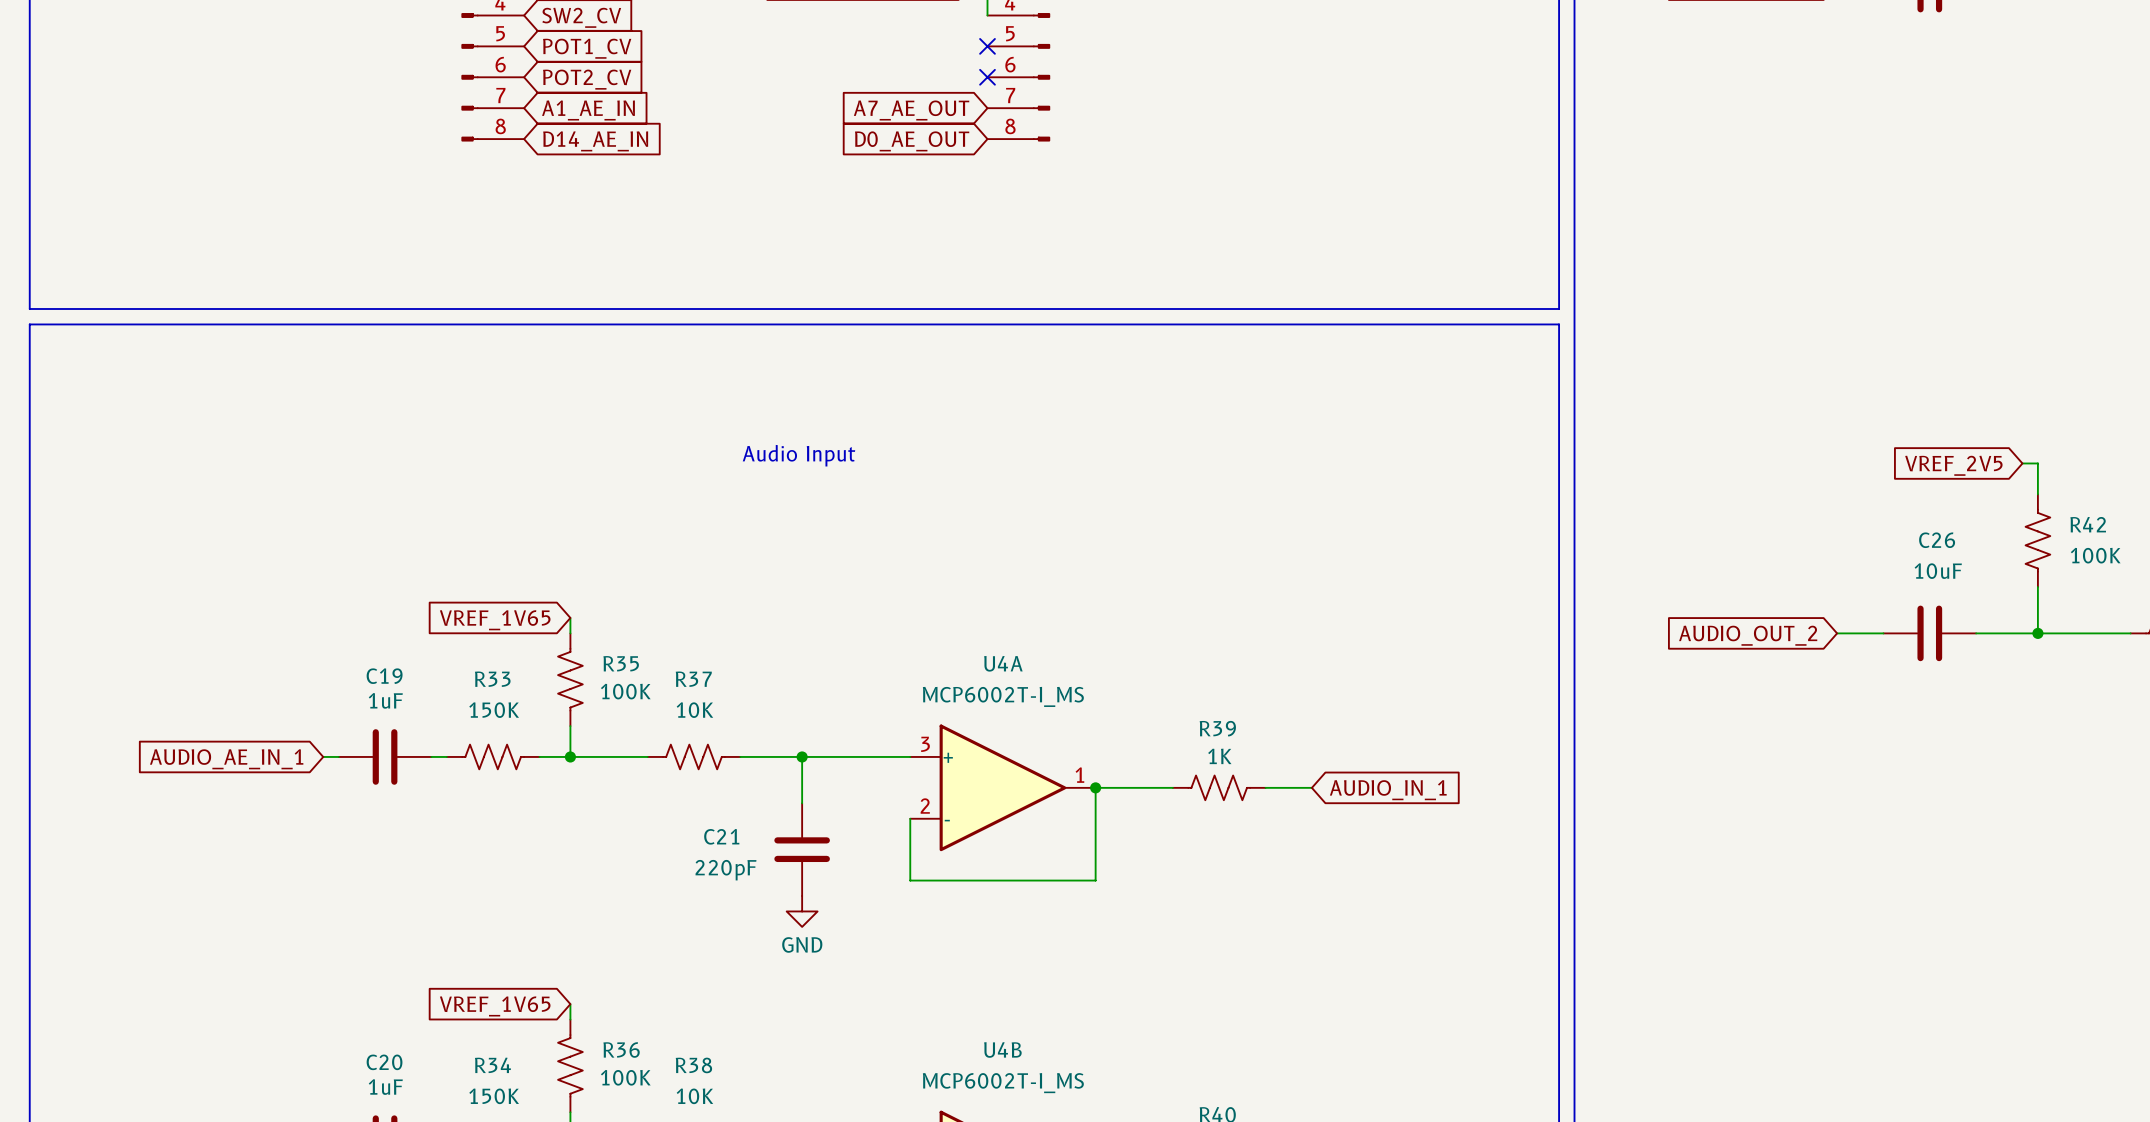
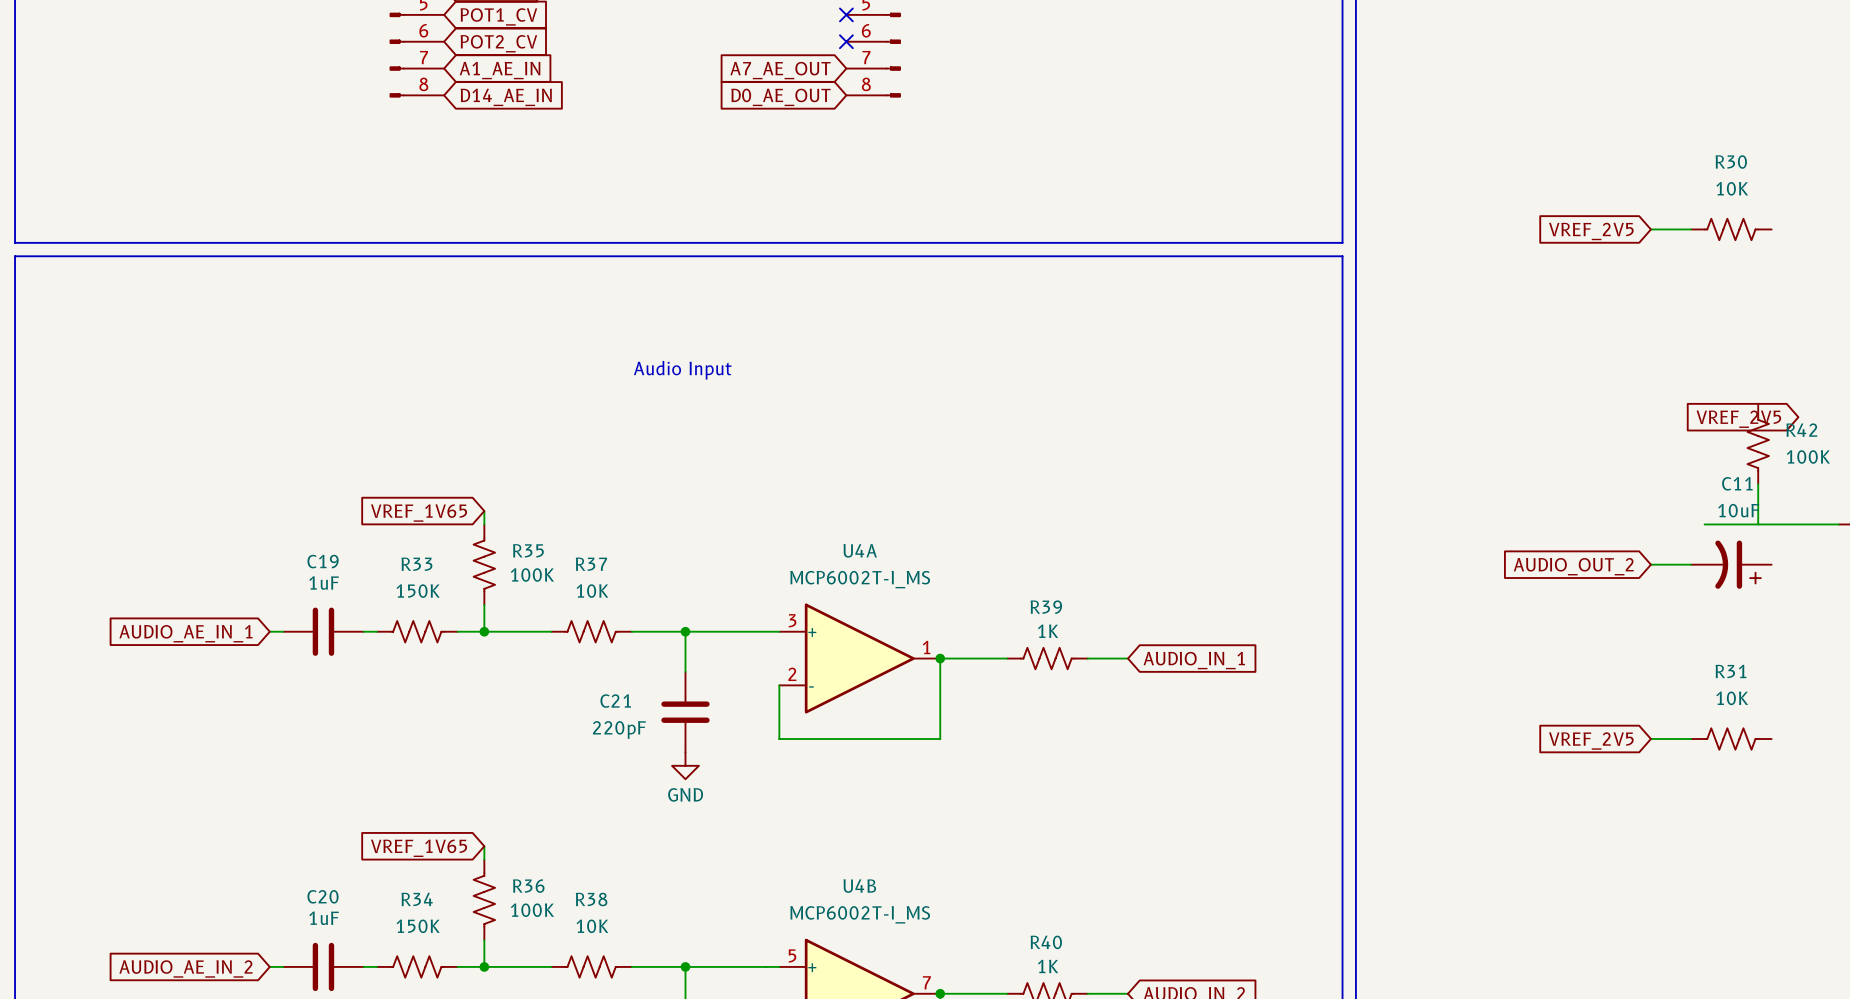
wire: none -> (1650, 229) (1691, 229)
R30: none -> 10K (1731, 229)
global label: none -> VREF_2V5 (1591, 231)
wire: (2022, 463) (2037, 463) (2037, 494) -> none
global label position: VREF_2V5 (1953, 465) -> VREF_2V5 (1738, 419)
wire: (1837, 633) (1883, 633) -> (1650, 564) (1691, 564)
C26: 10uF (1929, 633) -> none
junction: (2037, 633) -> none
global label position: AUDIO_OUT_2 (1748, 635) -> AUDIO_OUT_2 (1573, 566)
C11: none -> 10uF (1731, 564)
wire: none -> (1650, 739) (1691, 739)
R31: none -> 10K (1731, 739)
global label: none -> VREF_2V5 (1591, 741)

